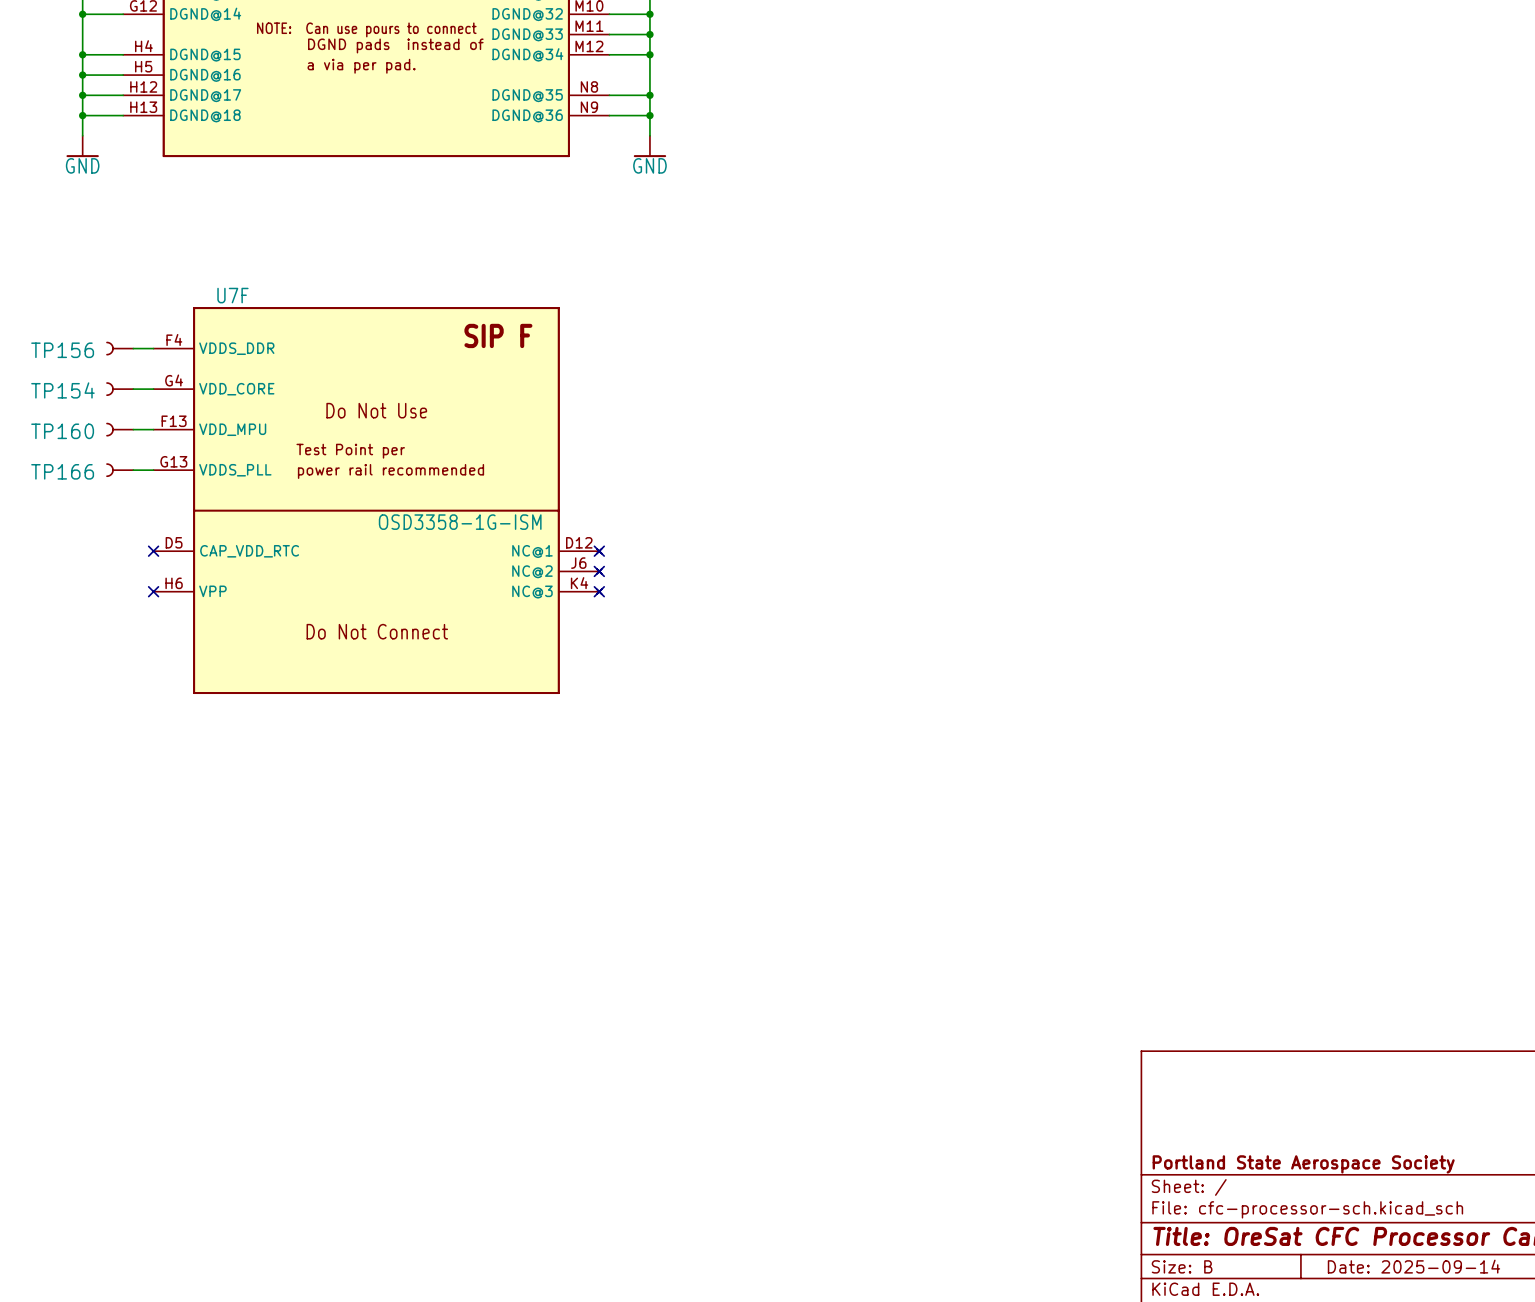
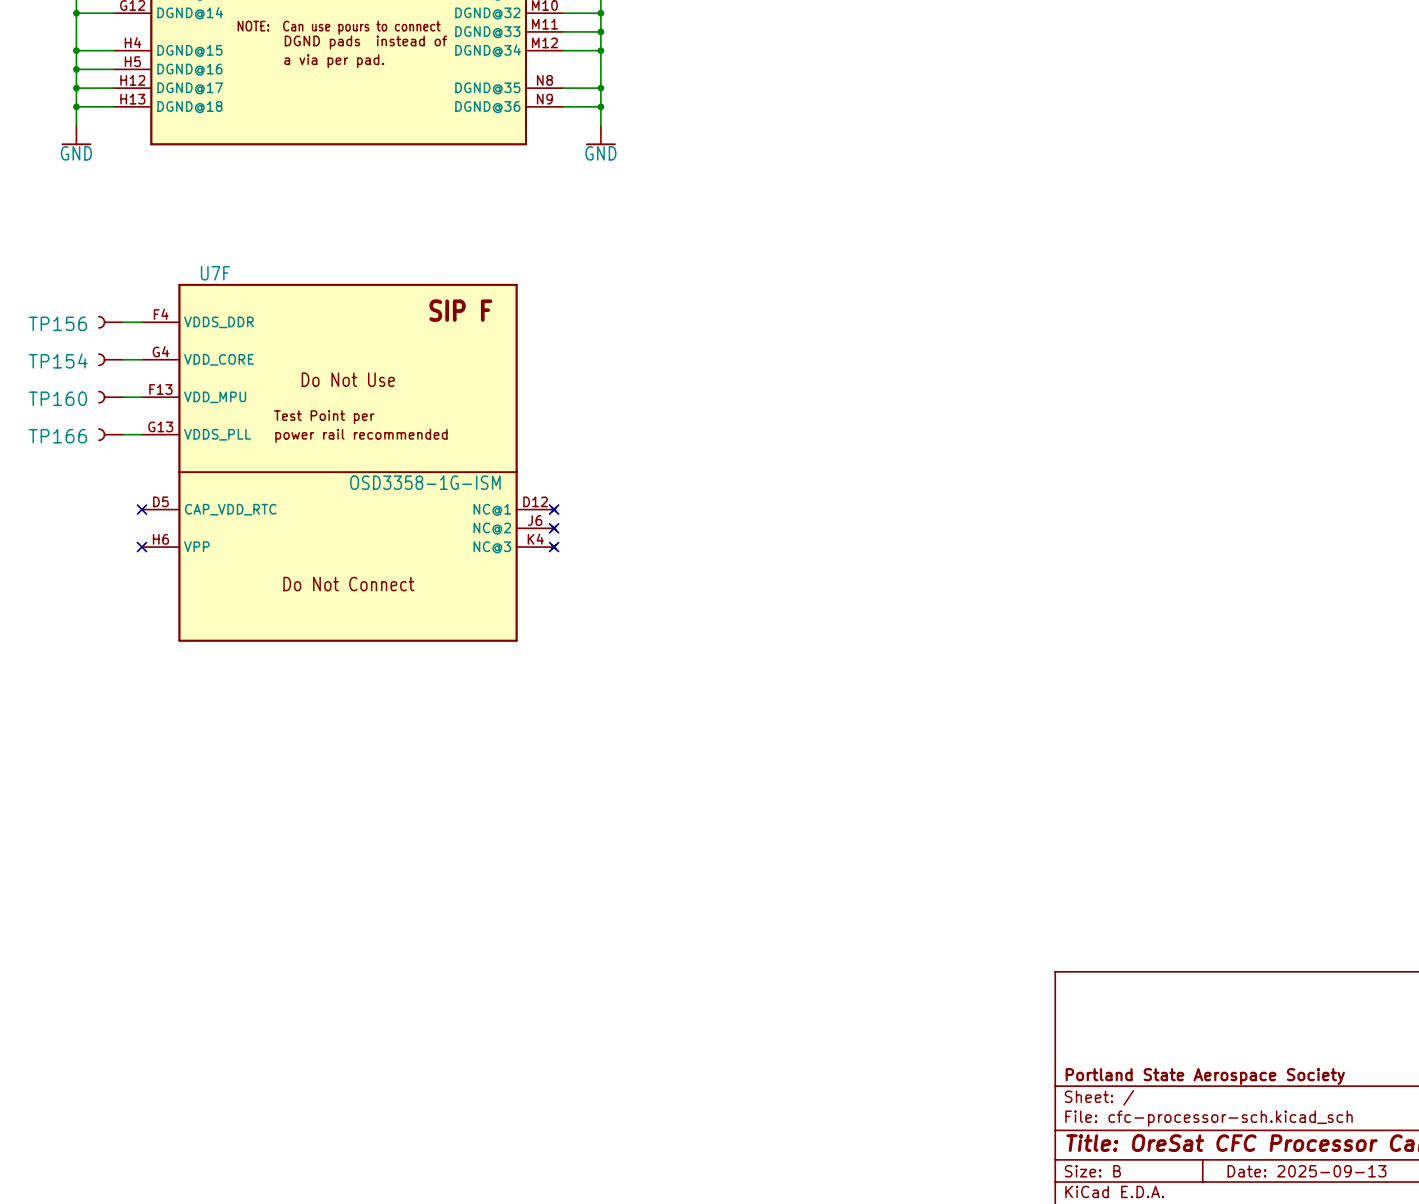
title block: Date: 2025-09-14 (1413, 1266) -> Date: 2025-09-13 (1307, 1171)

